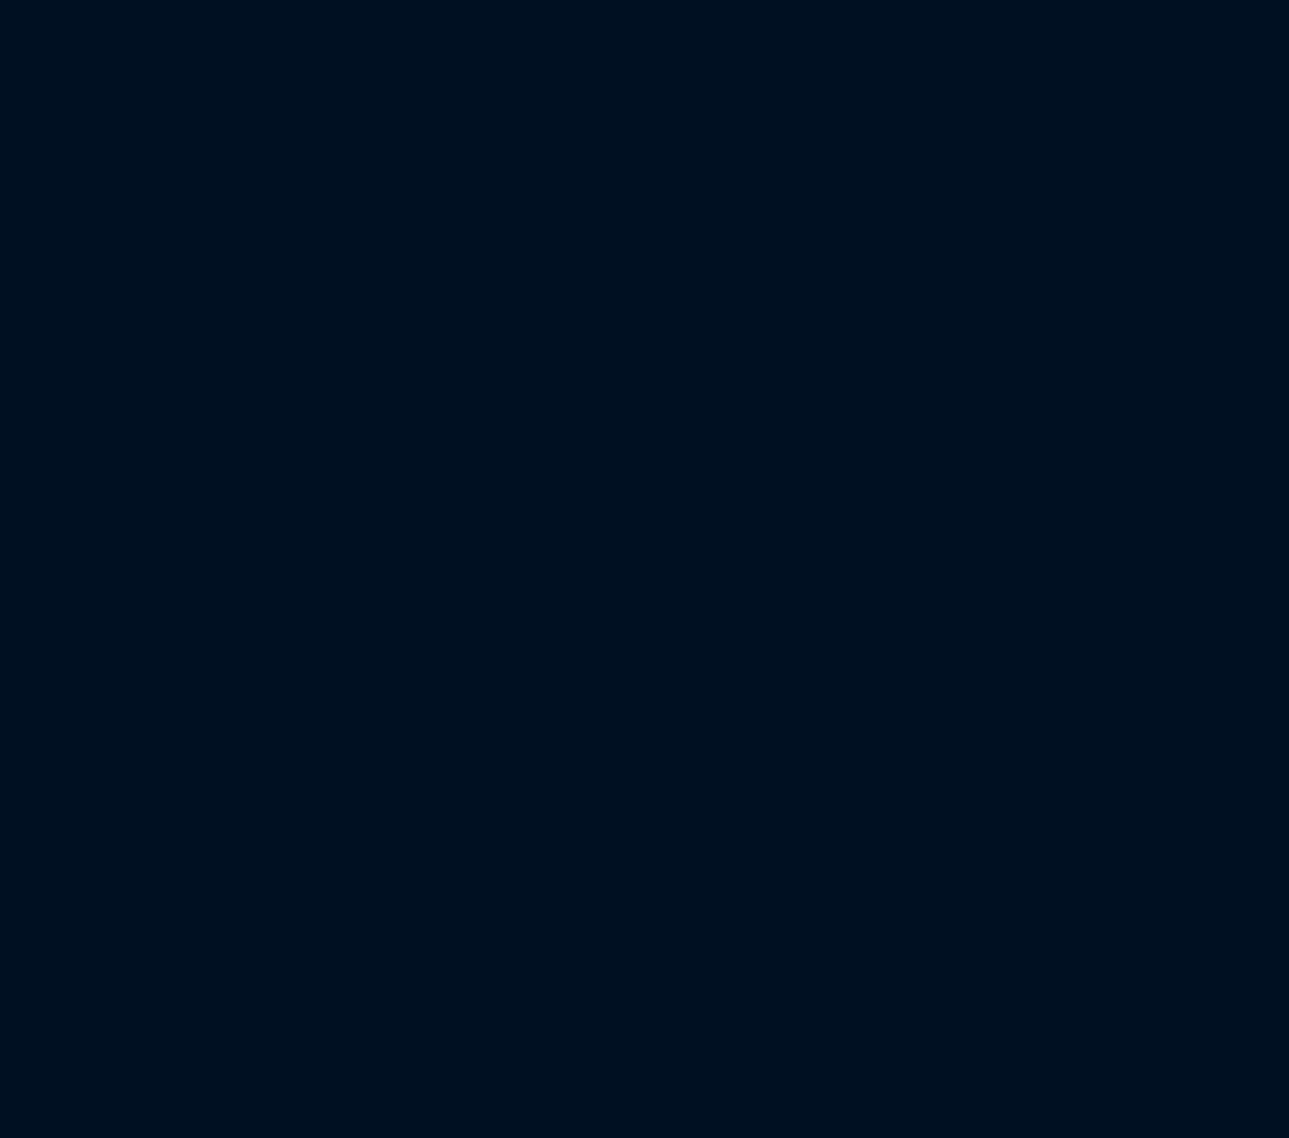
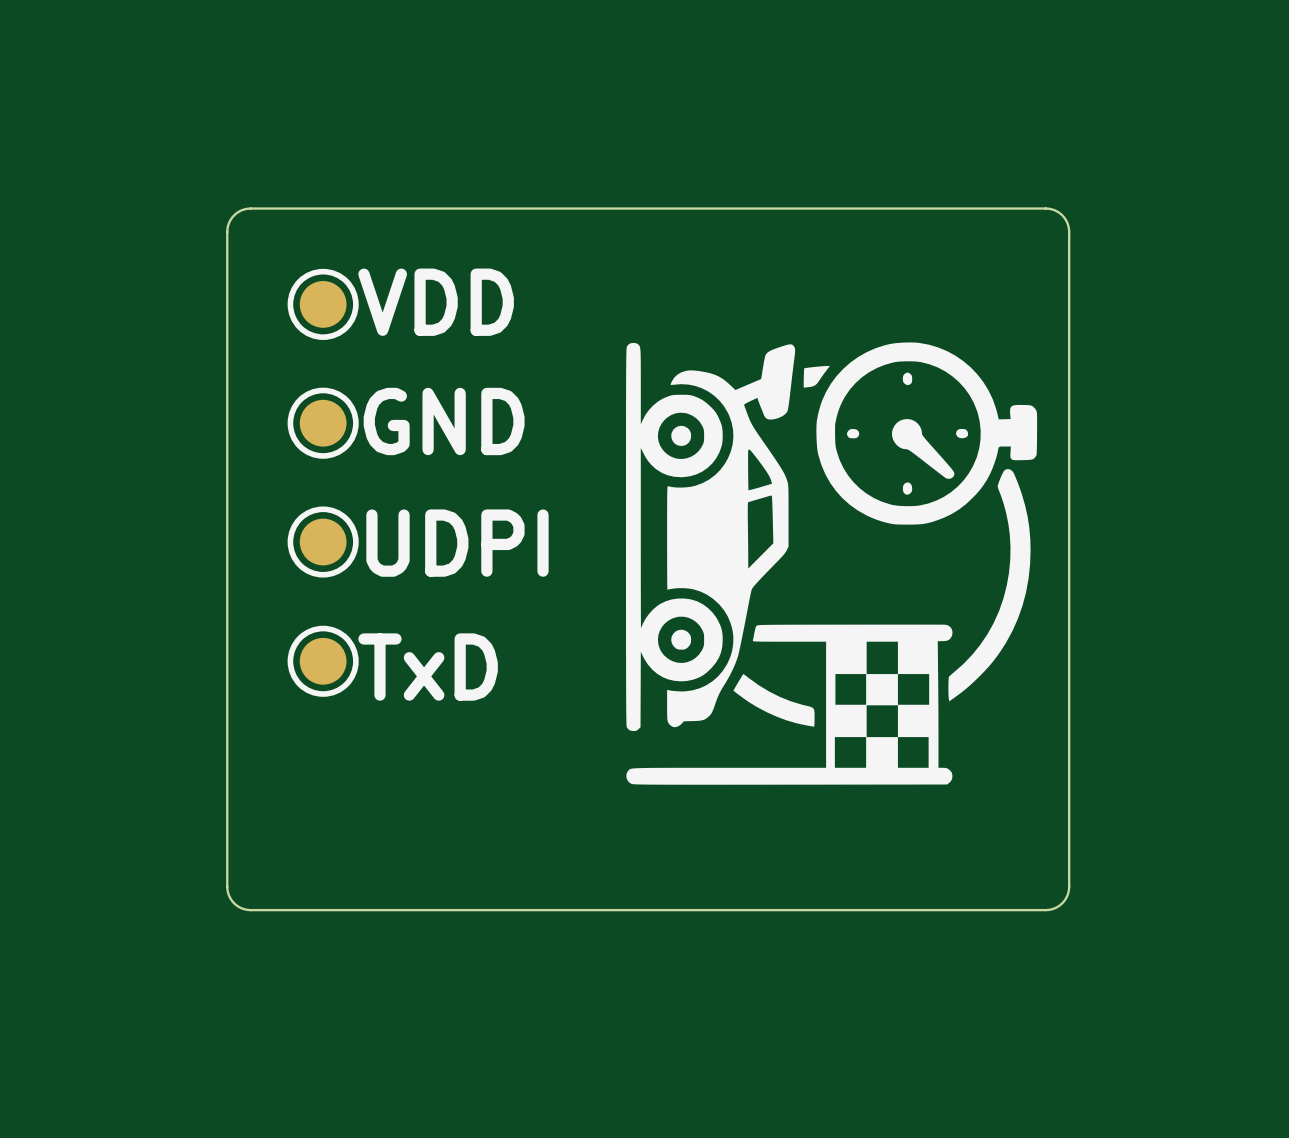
board edge: none -> (1045, 208) (250, 208) (236, 213) (229, 222) (227, 231) (227, 886) (232, 900) (241, 908) (250, 910) (1045, 910) (1060, 905) (1066, 898) (1069, 886) (1069, 231) (1067, 222) (1062, 215) (1054, 210) (1045, 208)
text: none -> VDD (436, 302)
part: none -> (323, 304)
drawing: none -> [626, 342, 1038, 785]
text: none -> GND (444, 421)
part: none -> (323, 423)
part: none -> (323, 542)
text: none -> UDPI (457, 543)
part: none -> (323, 661)
text: none -> TxD (428, 667)

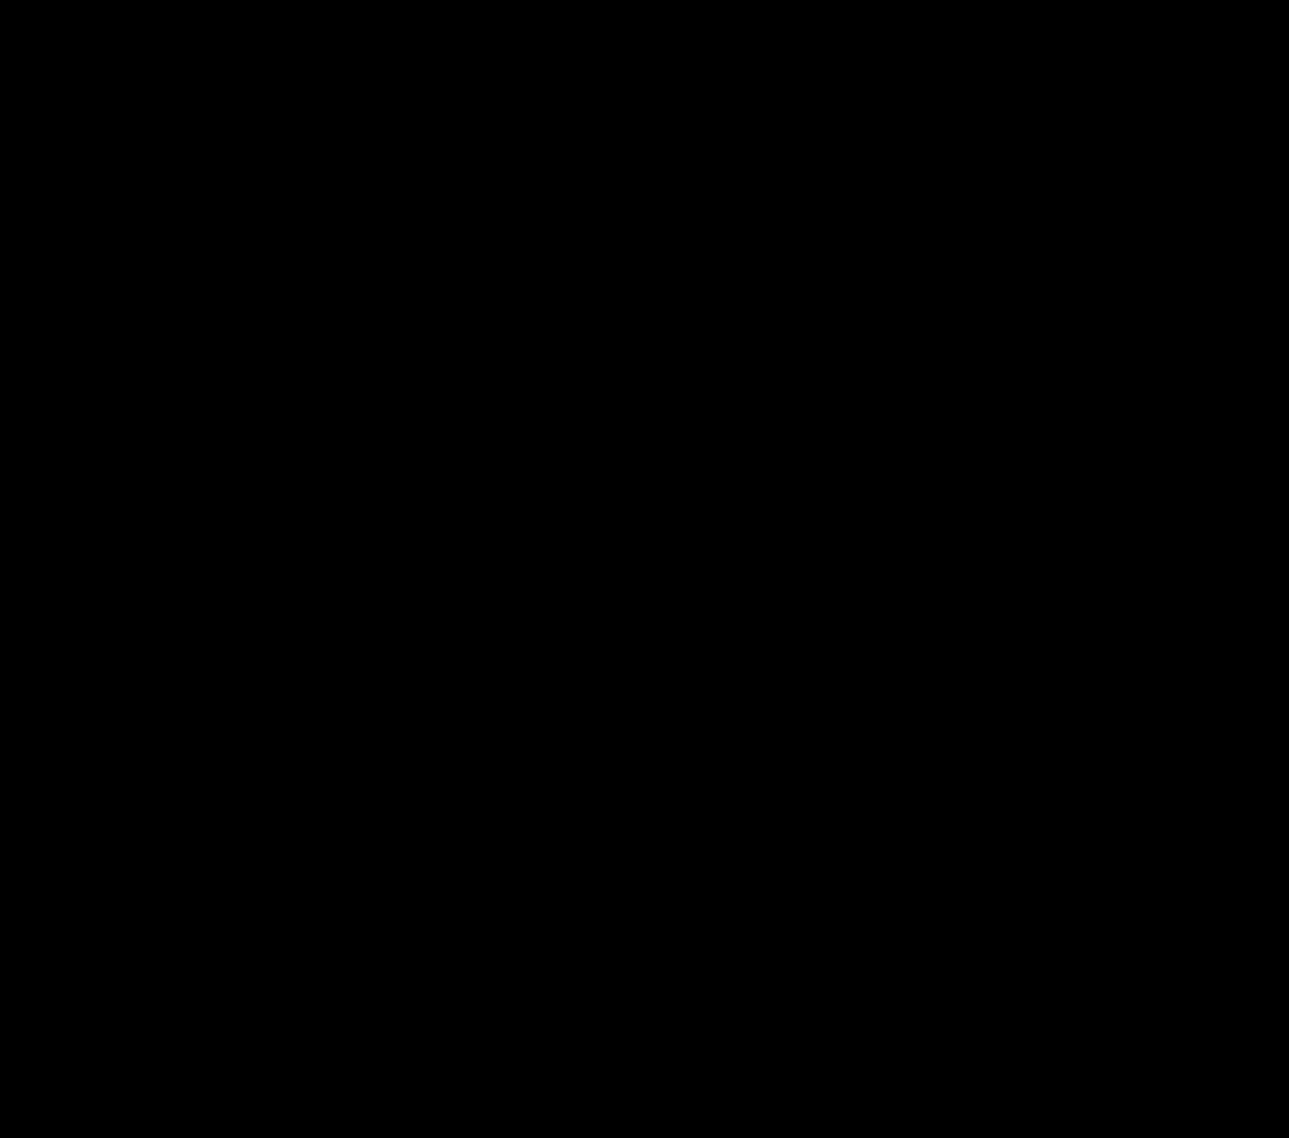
board edge: (1045, 208) (250, 208) (236, 213) (229, 222) (227, 231) (227, 886) (232, 900) (241, 908) (250, 910) (1045, 910) (1060, 905) (1066, 898) (1069, 886) (1069, 231) (1067, 222) (1062, 215) (1054, 210) (1045, 208) -> none
text: VDD (436, 302) -> none
part: (323, 304) -> none
drawing: [626, 342, 1038, 785] -> none
text: GND (444, 421) -> none
part: (323, 423) -> none
part: (323, 542) -> none
text: UDPI (457, 543) -> none
part: (323, 661) -> none
text: TxD (428, 667) -> none

